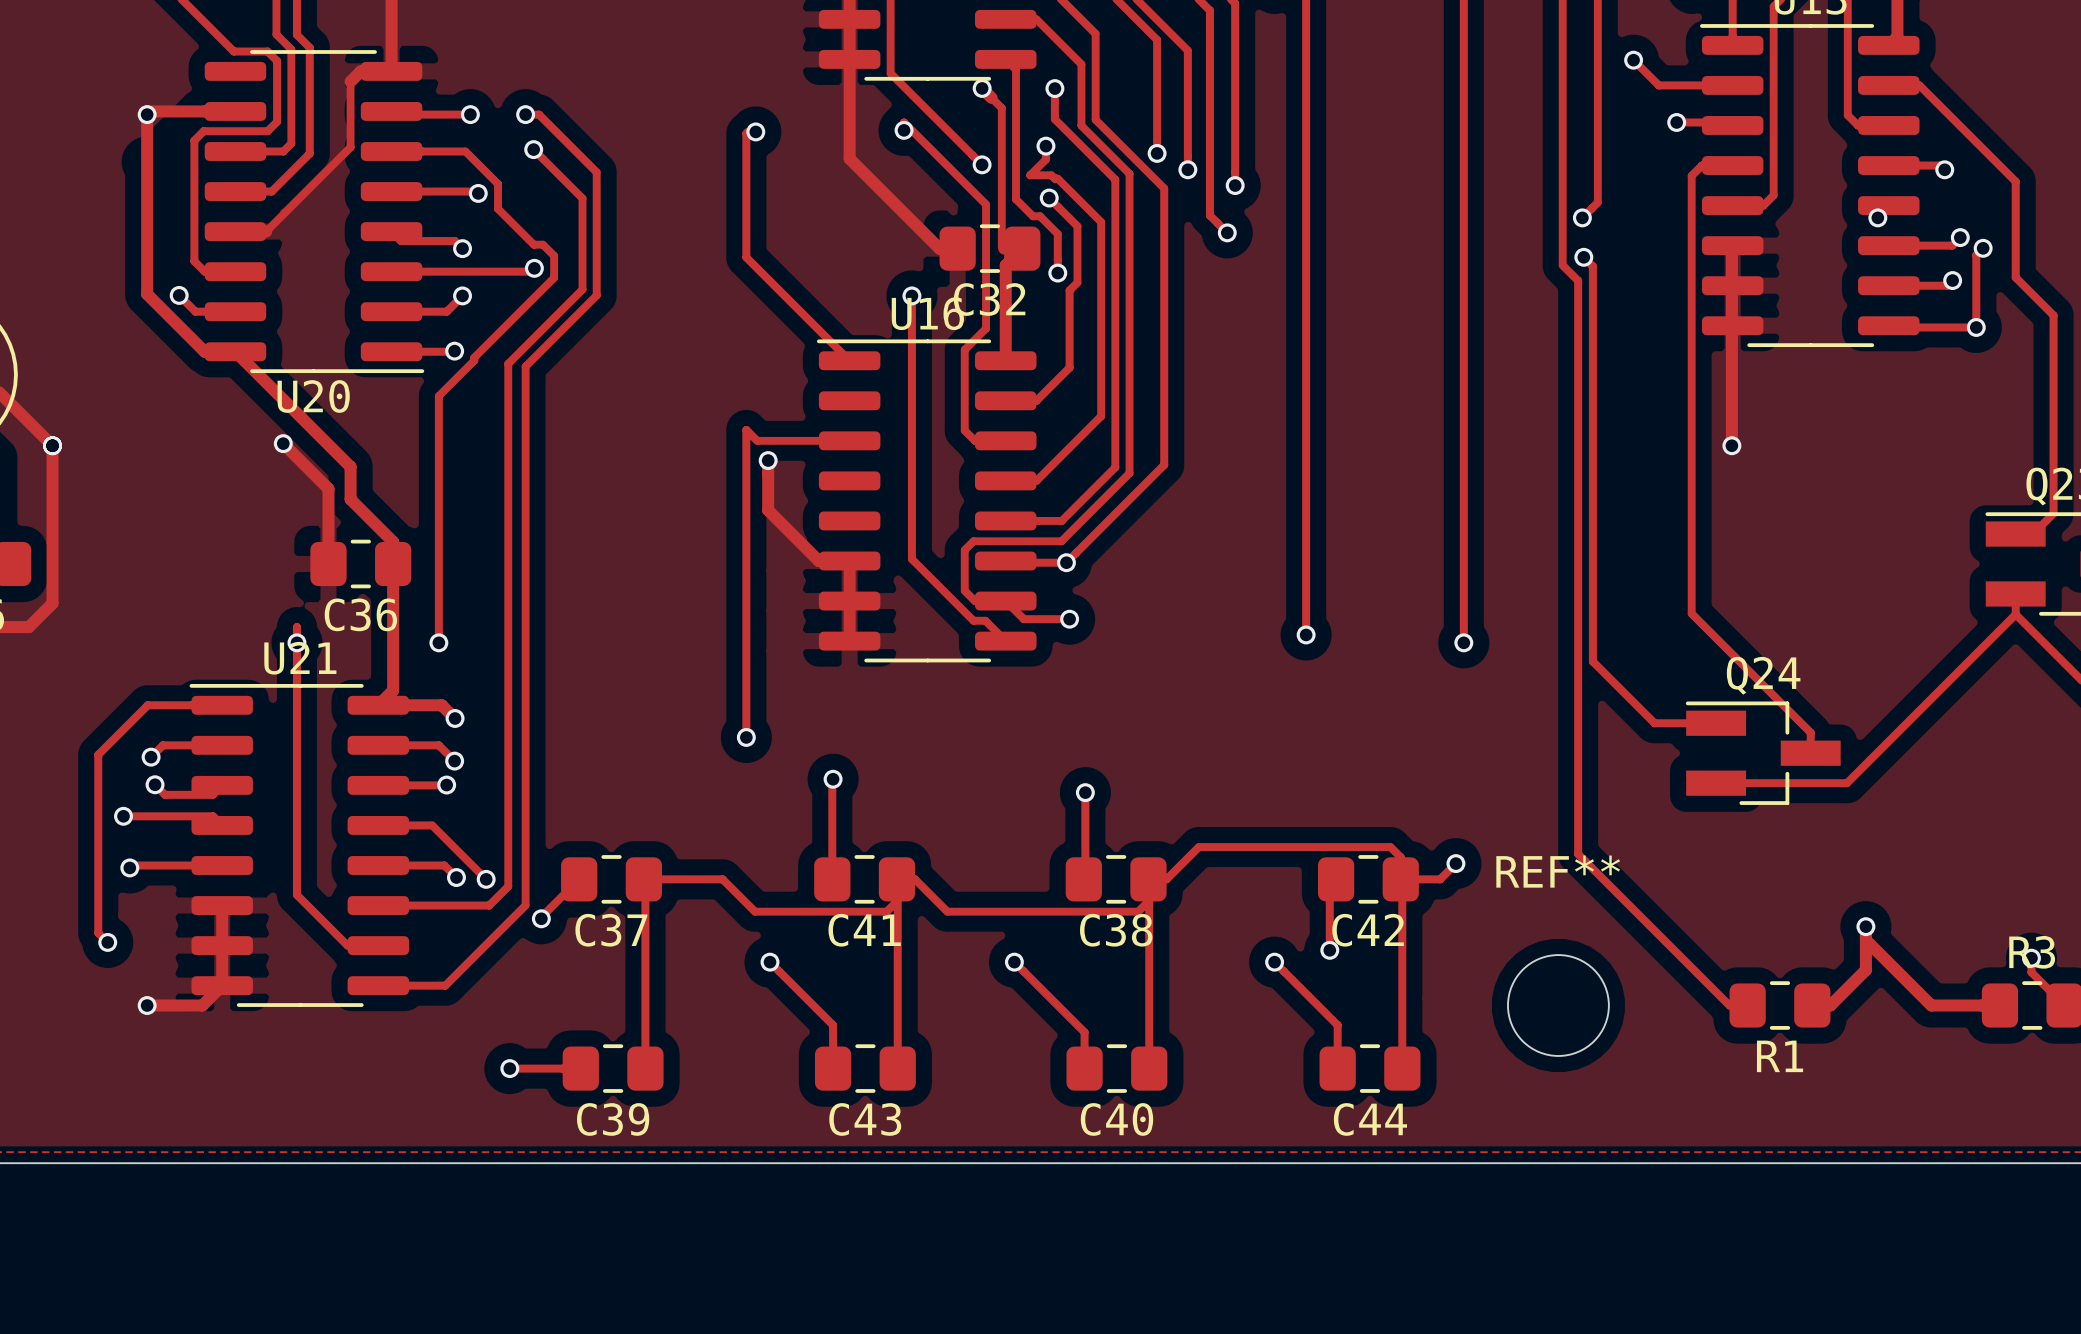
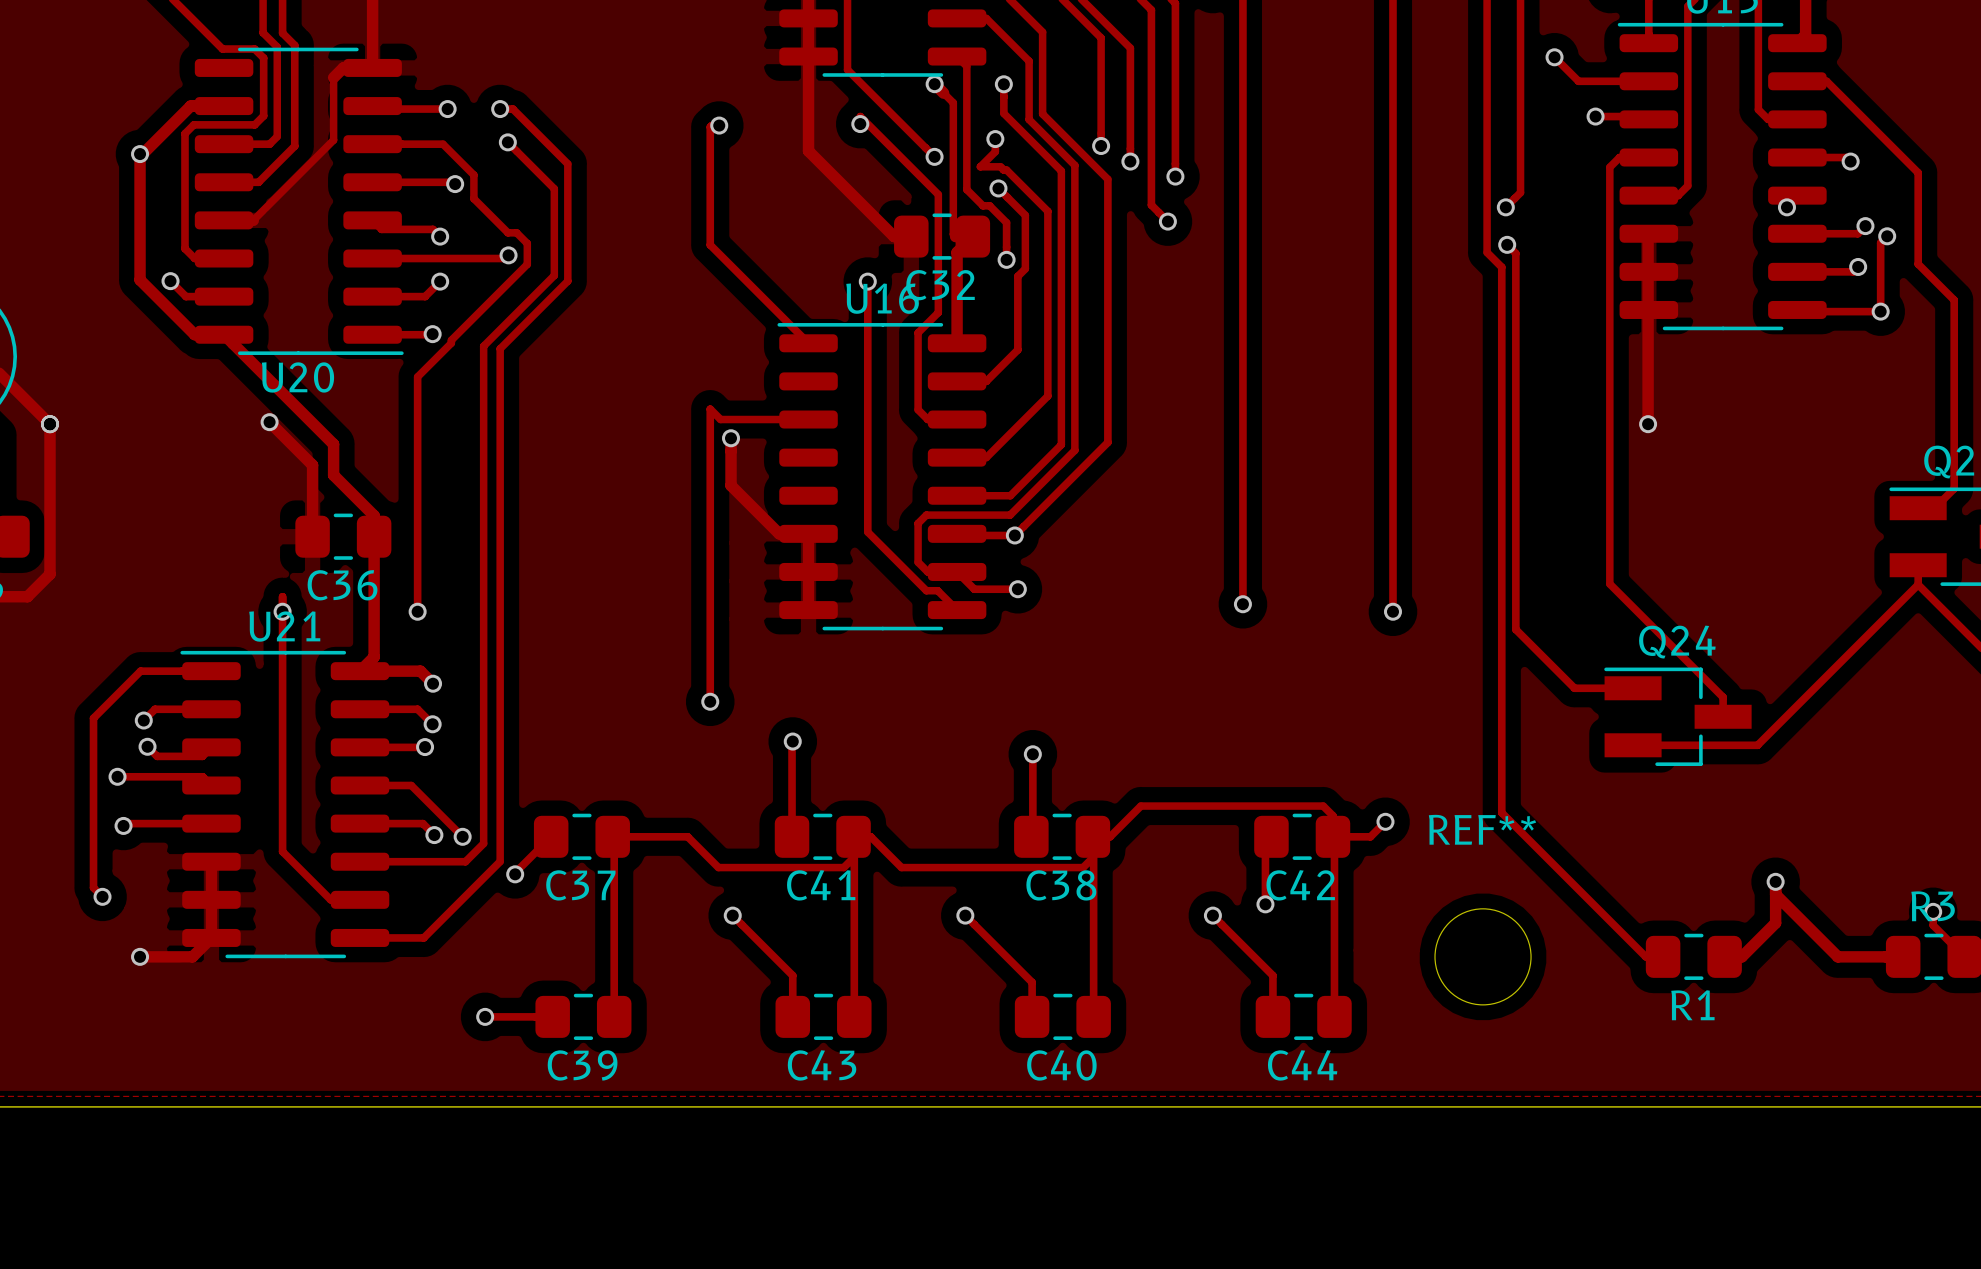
track: (200, 111) (147, 111) (147, 164) -> (190, 106) (140, 156)
via position: (147, 114) -> (140, 154)

